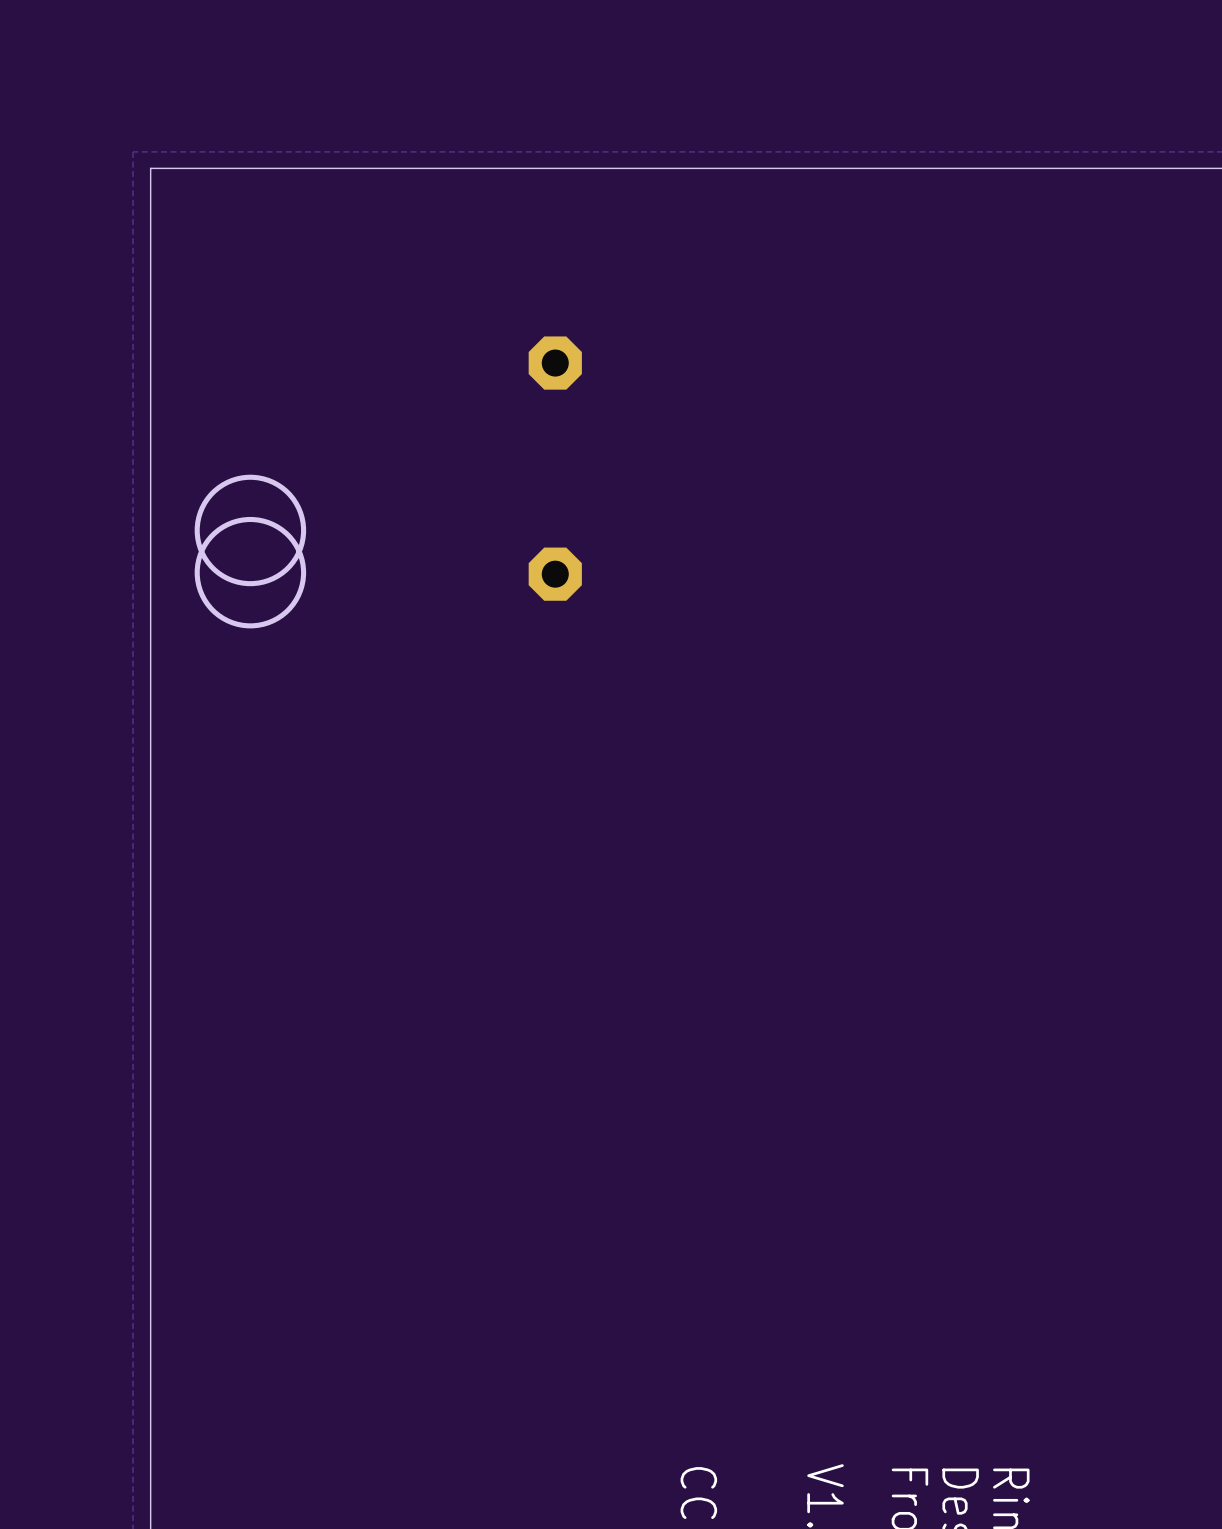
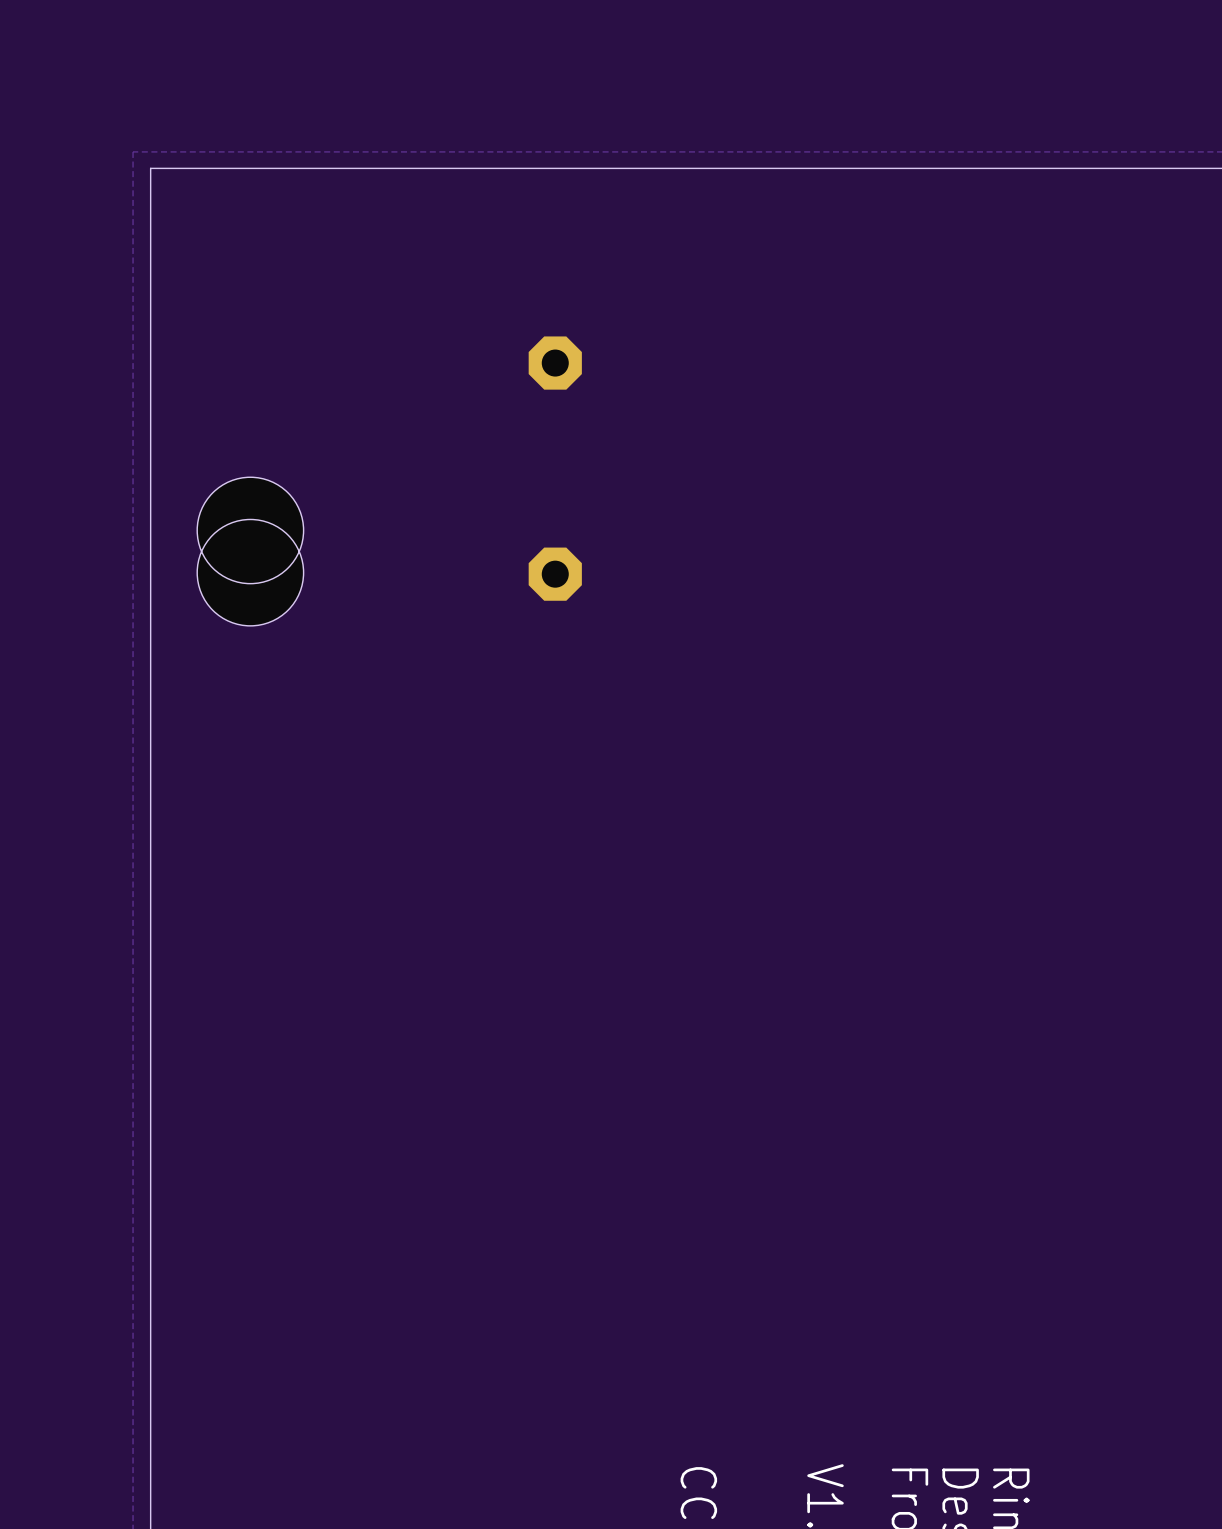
round board edge: [194, 474, 307, 587] -> none
round board edge: [194, 516, 307, 629] -> none
part: none -> (250, 551)

